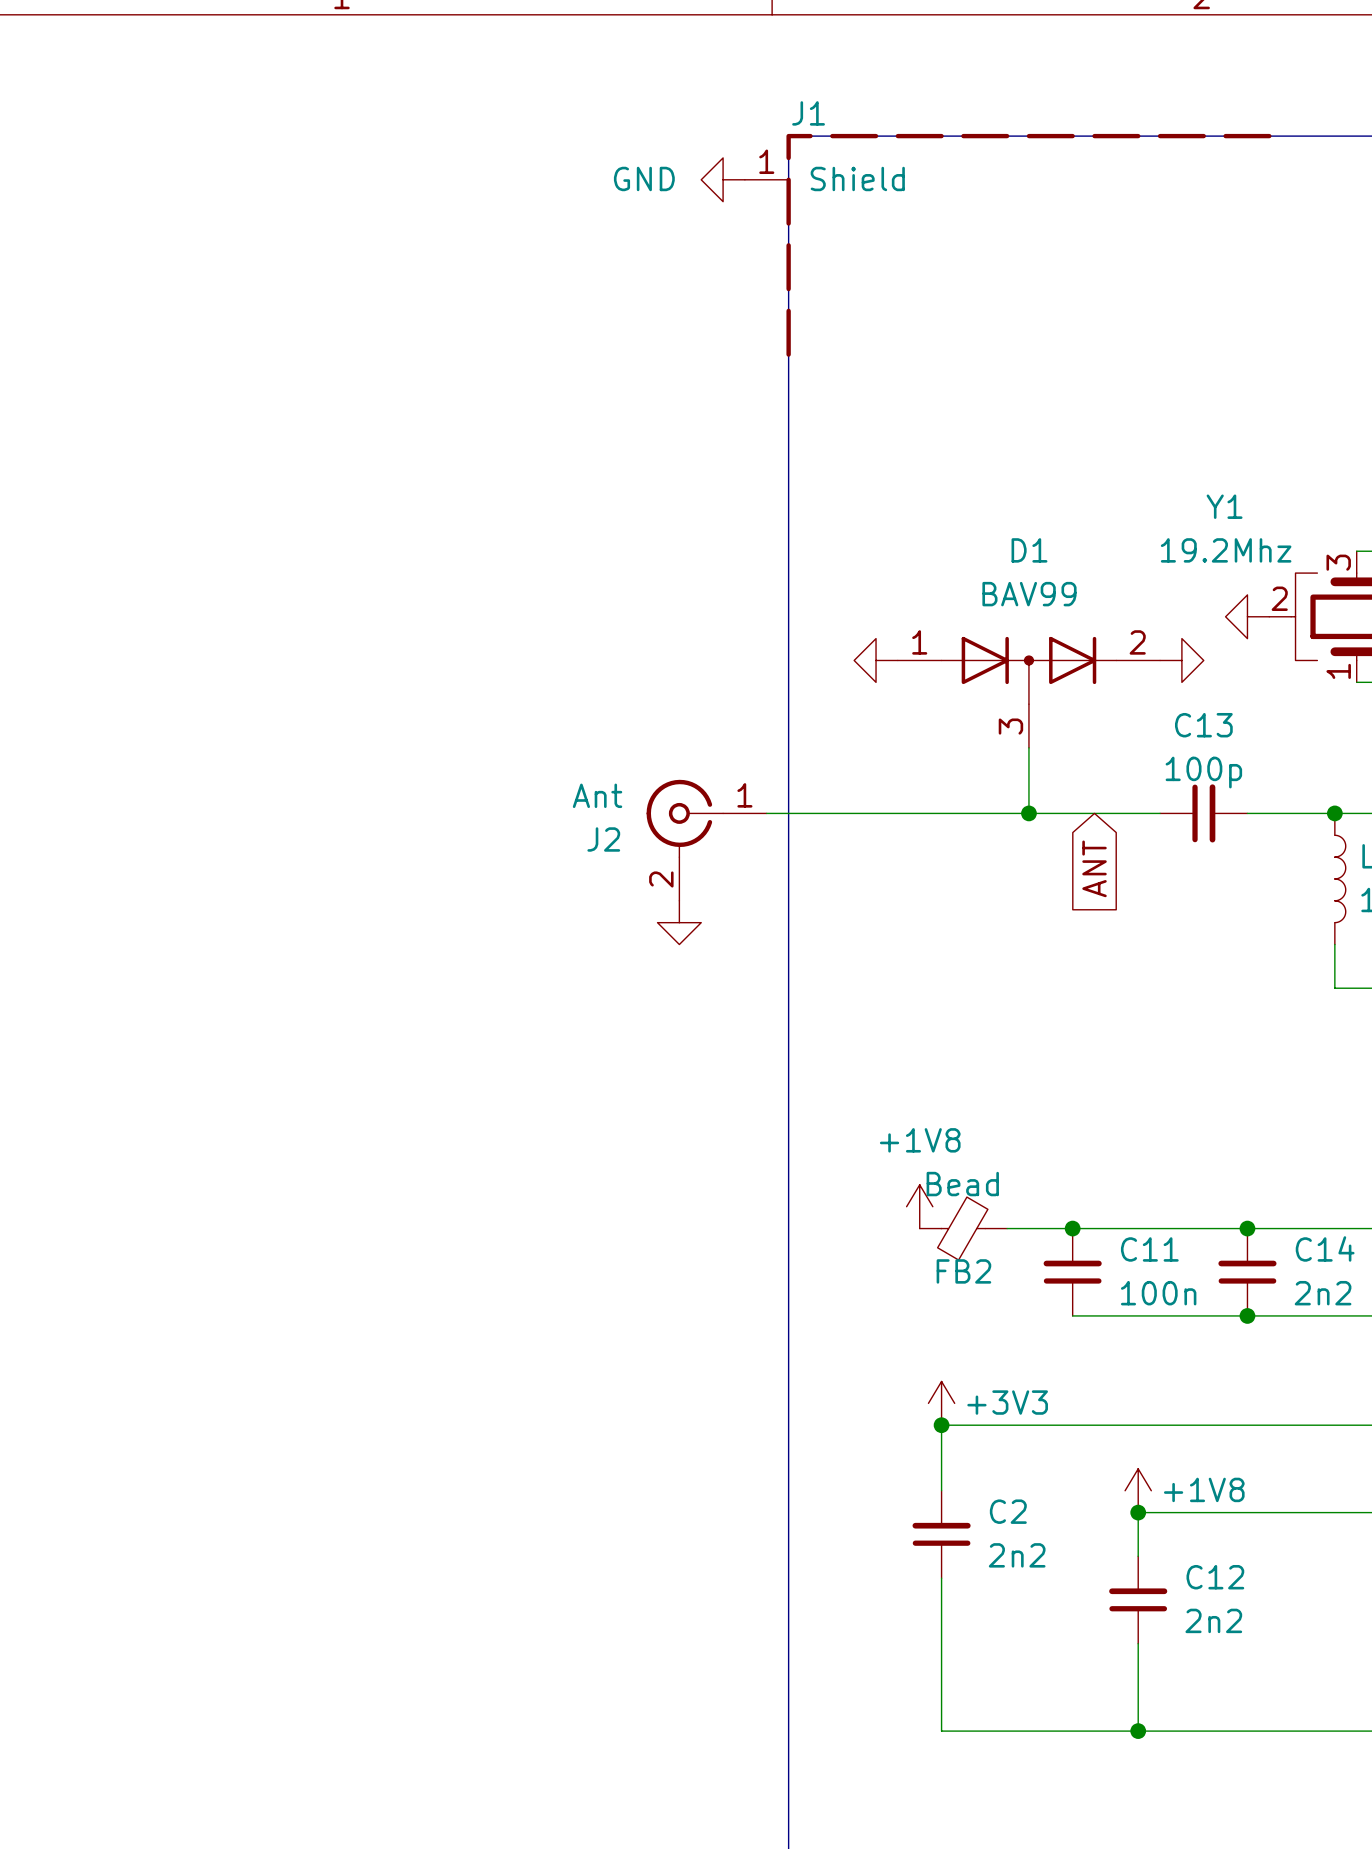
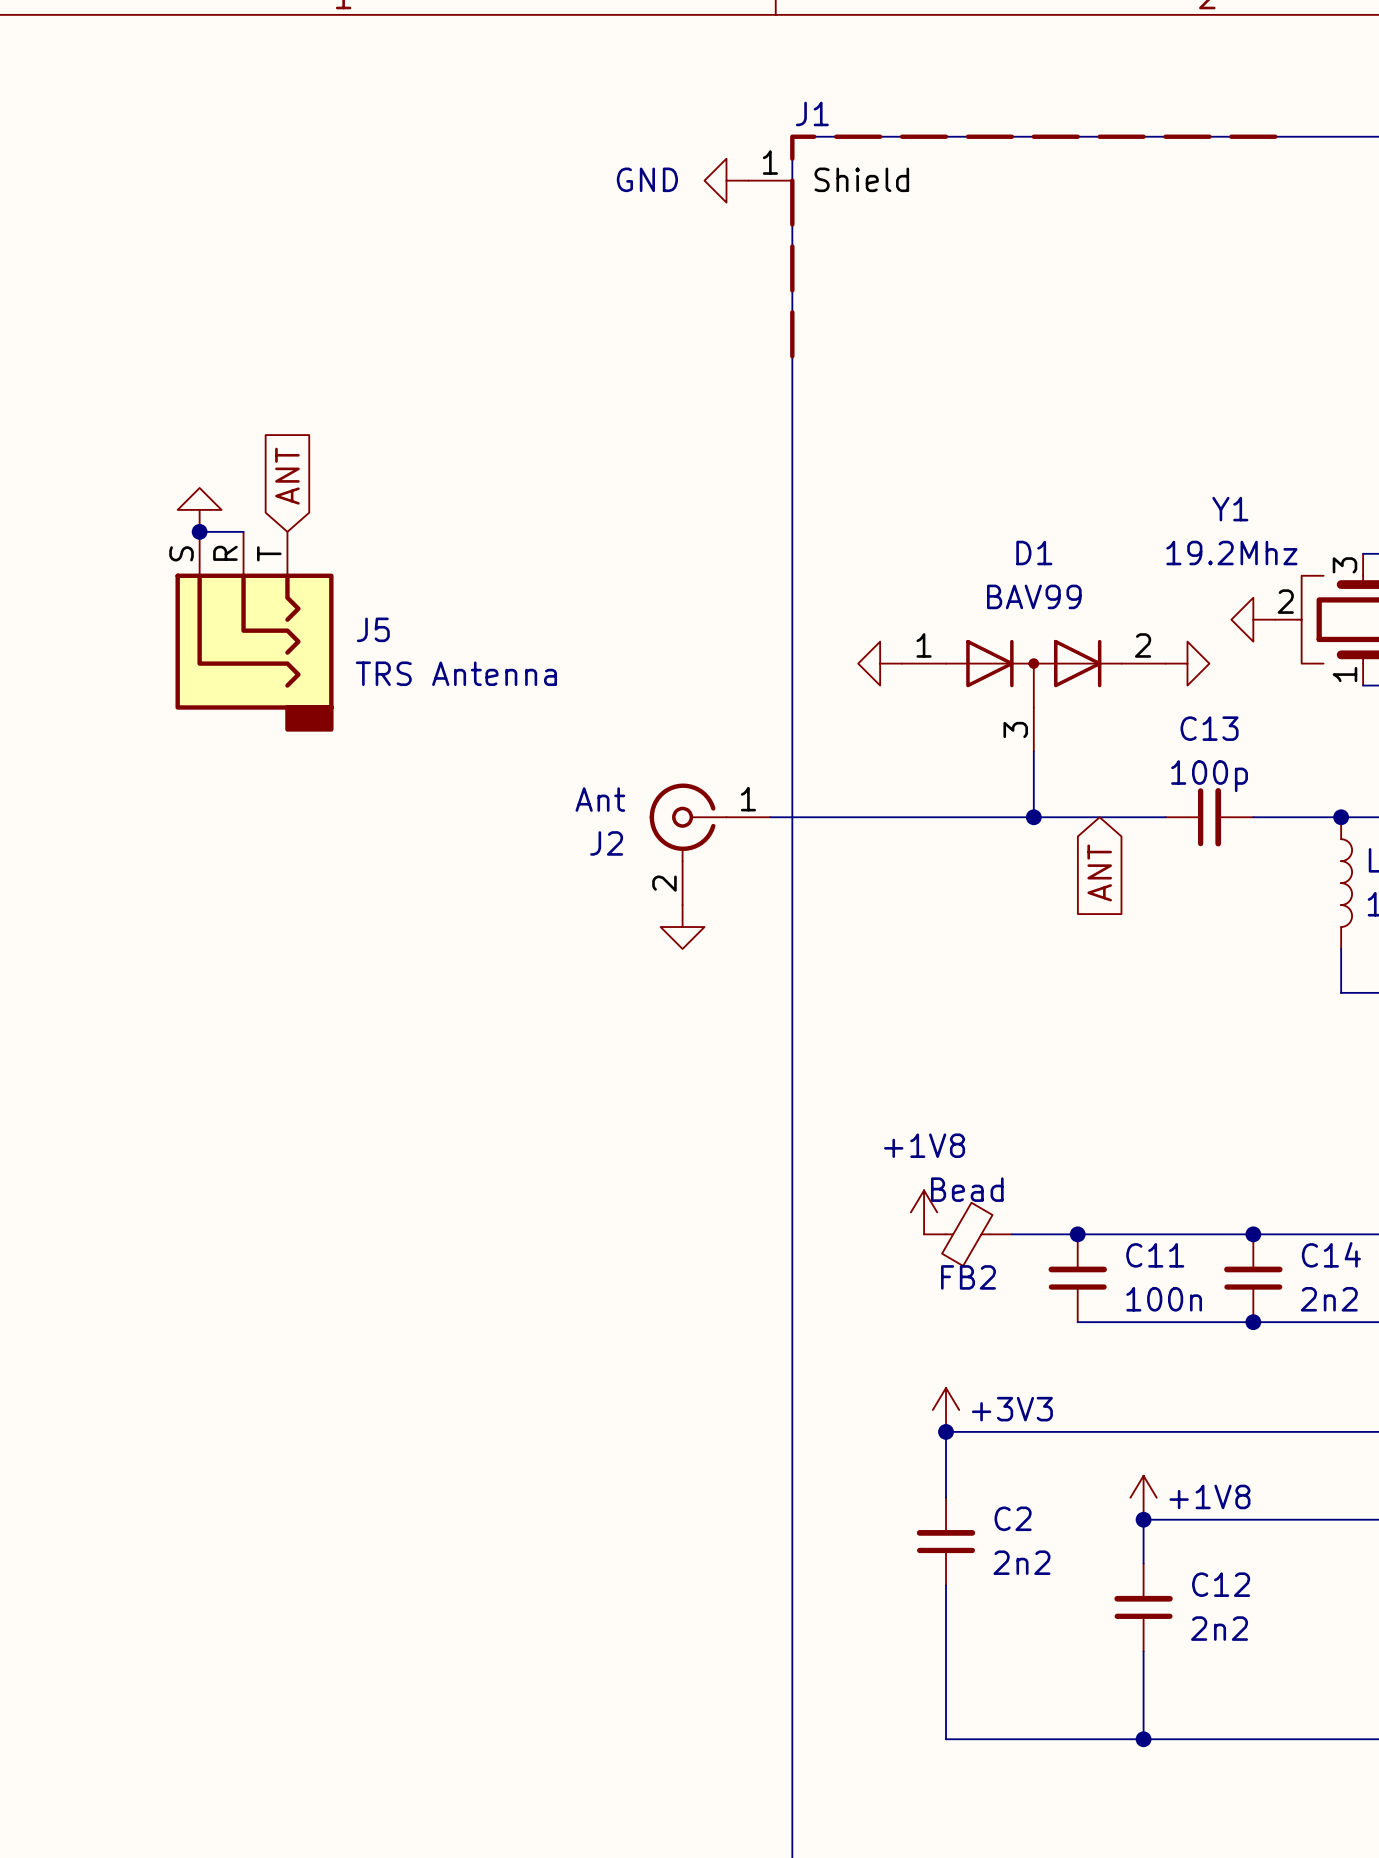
global label: none -> ANT (287, 476)
power symbol: none -> (199, 509)
wire: none -> (199, 531) (243, 531)
junction: none -> (199, 531)
J5: none -> TRS Antenna (254, 631)

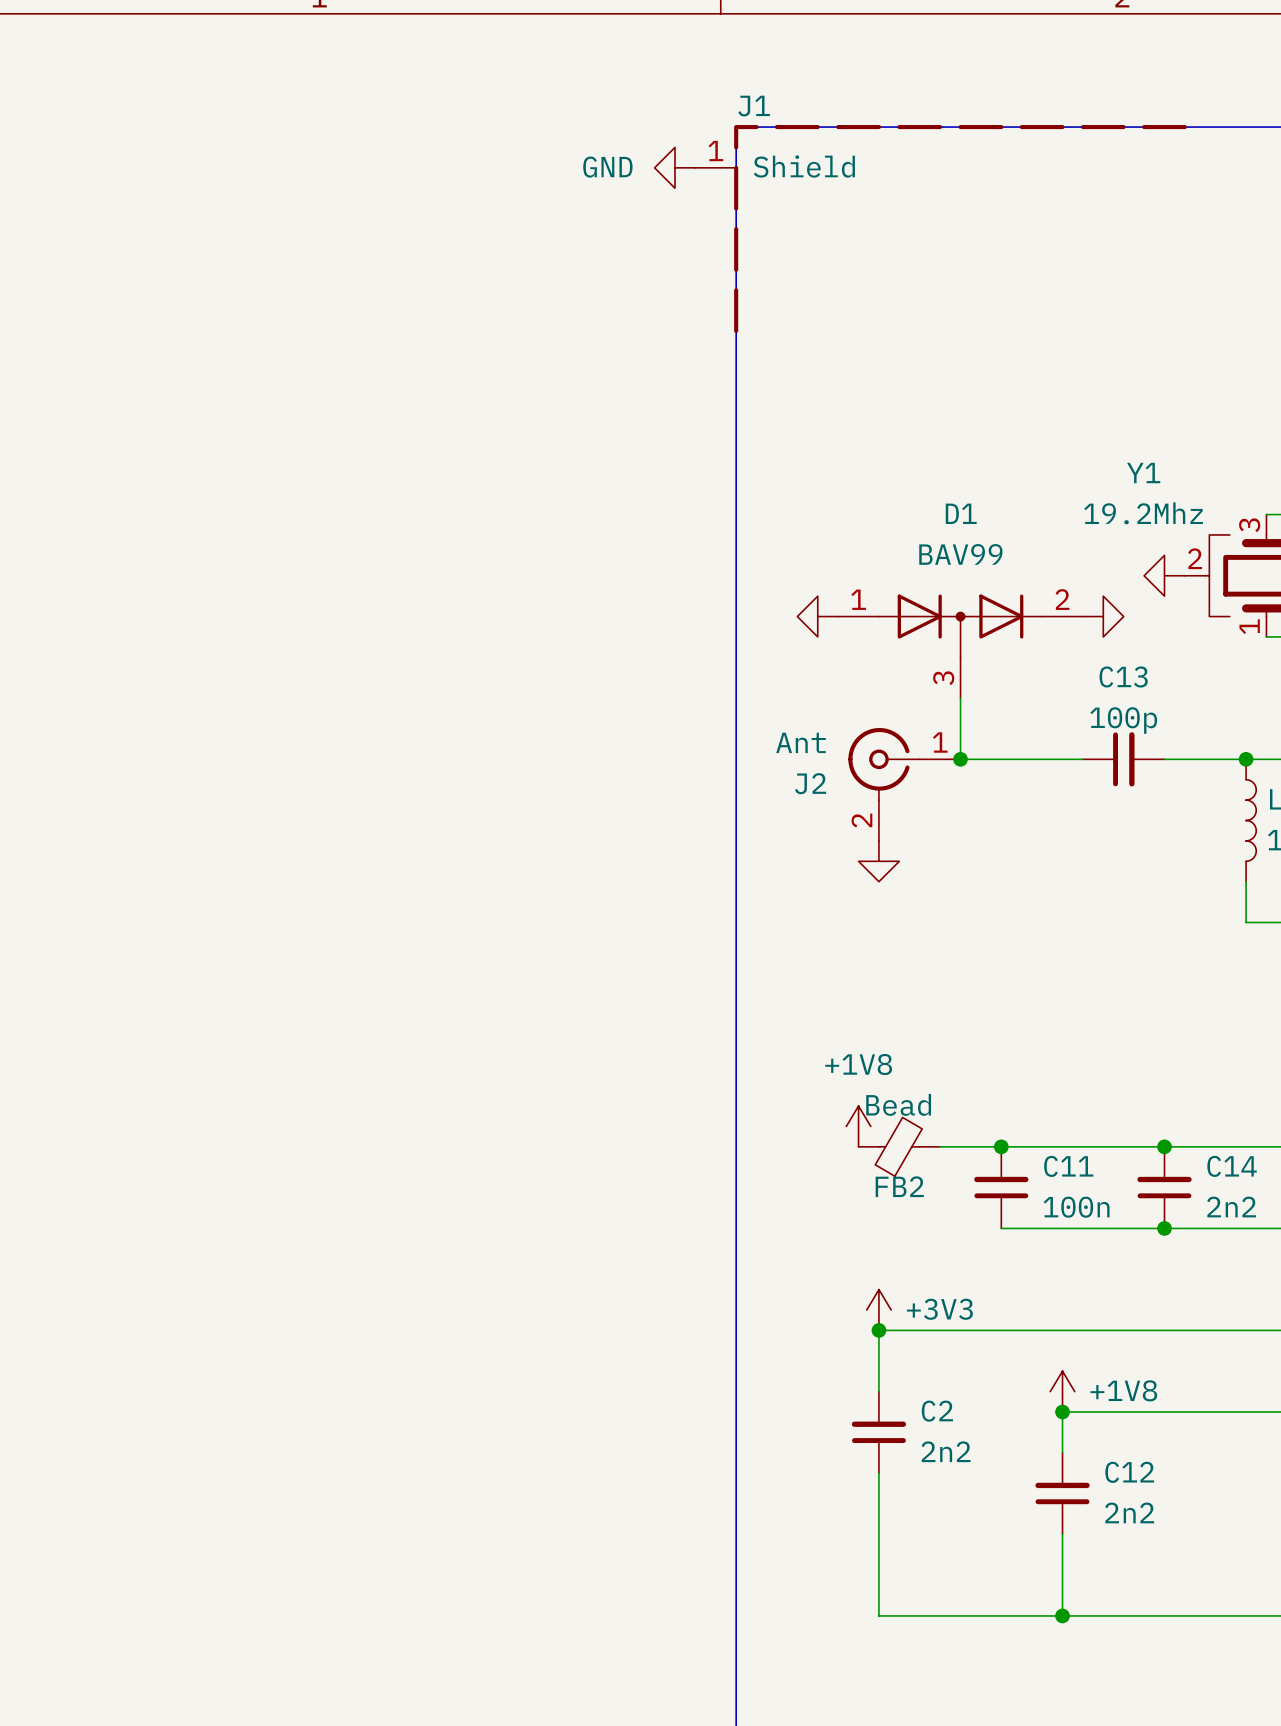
global label: ANT (287, 476) -> none
power symbol: (199, 509) -> none
wire: (199, 531) (243, 531) -> none
junction: (199, 531) -> none
J5: TRS Antenna (254, 631) -> none
wire: (770, 817) (1033, 817) -> none
J2 position: (710, 844) -> (904, 784)
global label: ANT (1099, 872) -> none
power symbol position: (682, 927) -> (878, 861)

